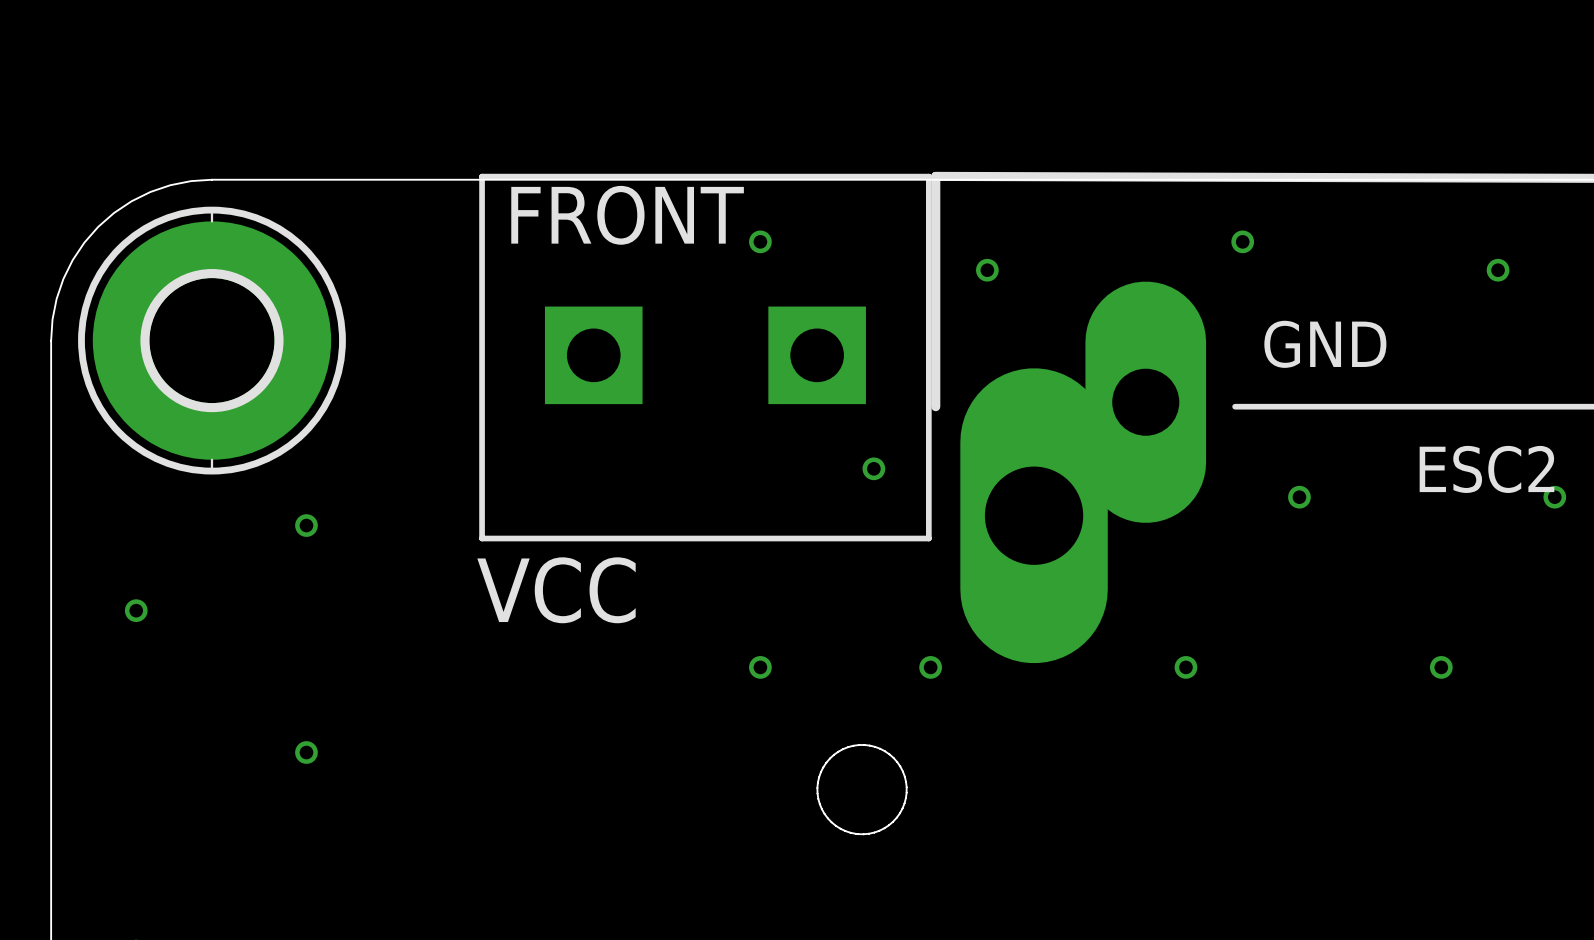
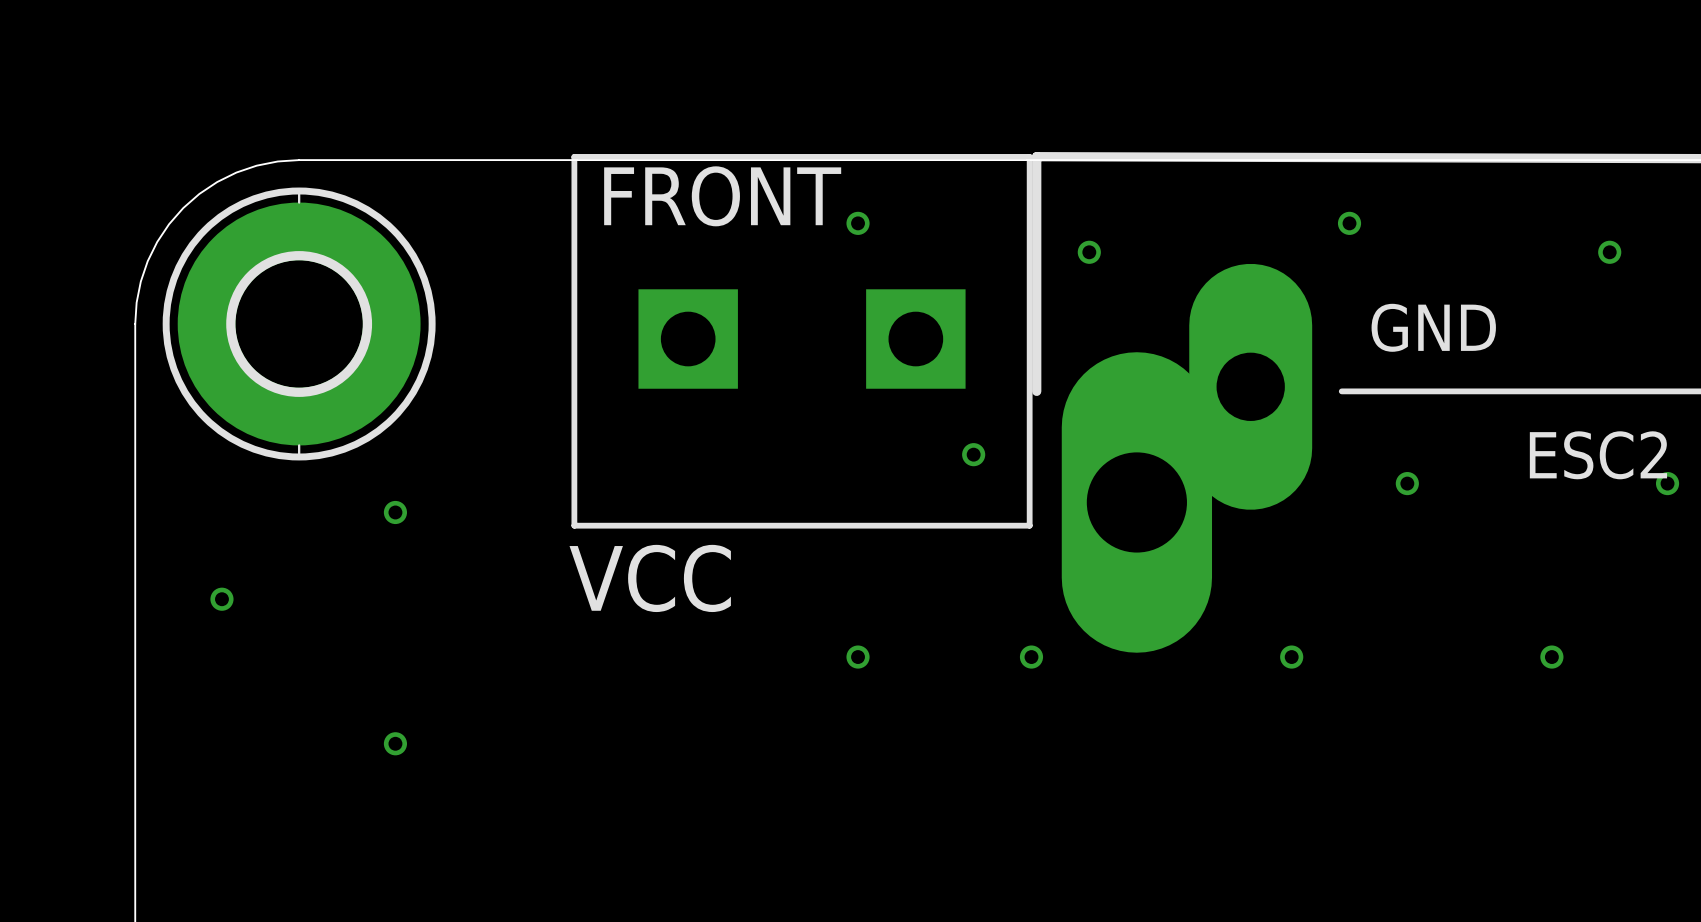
board edge: (858, 745) (875, 746) (889, 754) (902, 771) (906, 787) (904, 803) (893, 821) (879, 830) (863, 834) (845, 831) (831, 822) (821, 809) (817, 793) (819, 777) (826, 762) (843, 749) (858, 745) -> none

